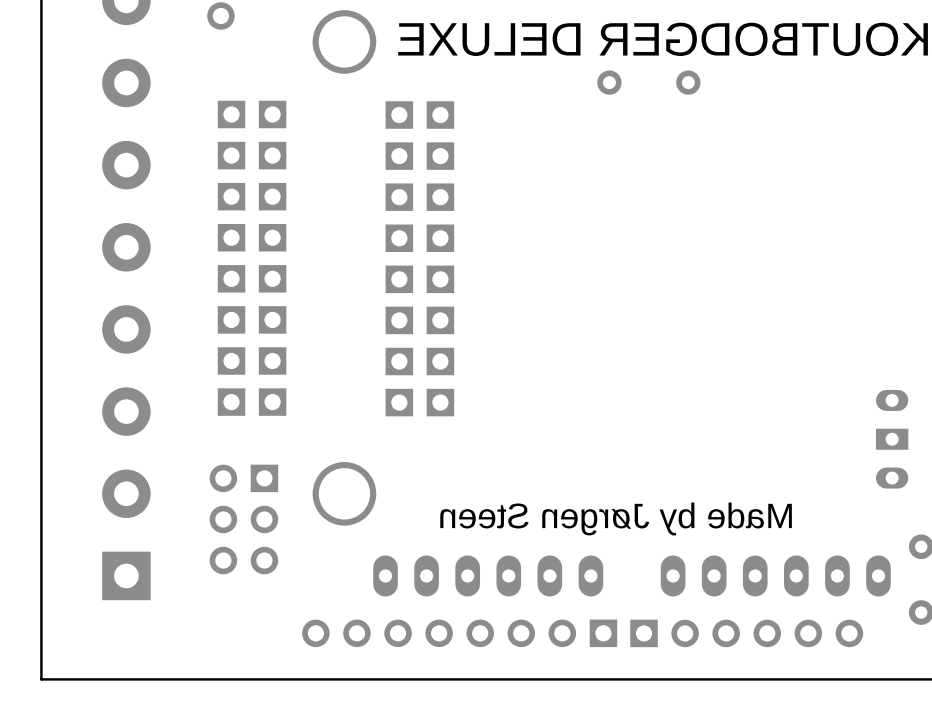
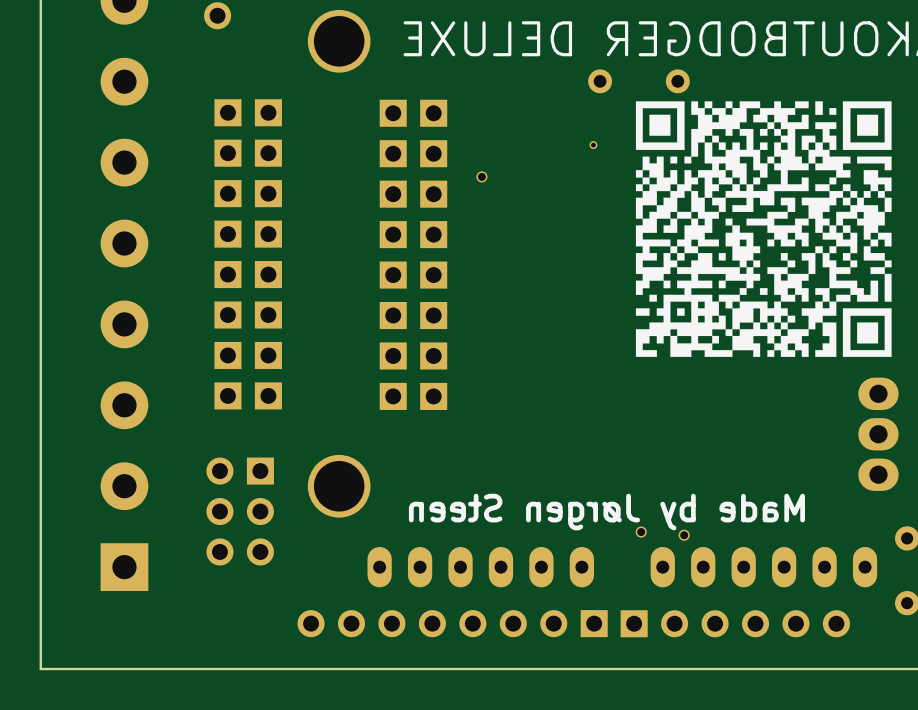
drawing: none -> [635, 101, 892, 357]
part: none -> (593, 145)
part: none -> (481, 176)
part footprint: [875, 389, 909, 489] -> [858, 377, 899, 491]
part: none -> (641, 532)
part: none -> (684, 535)

